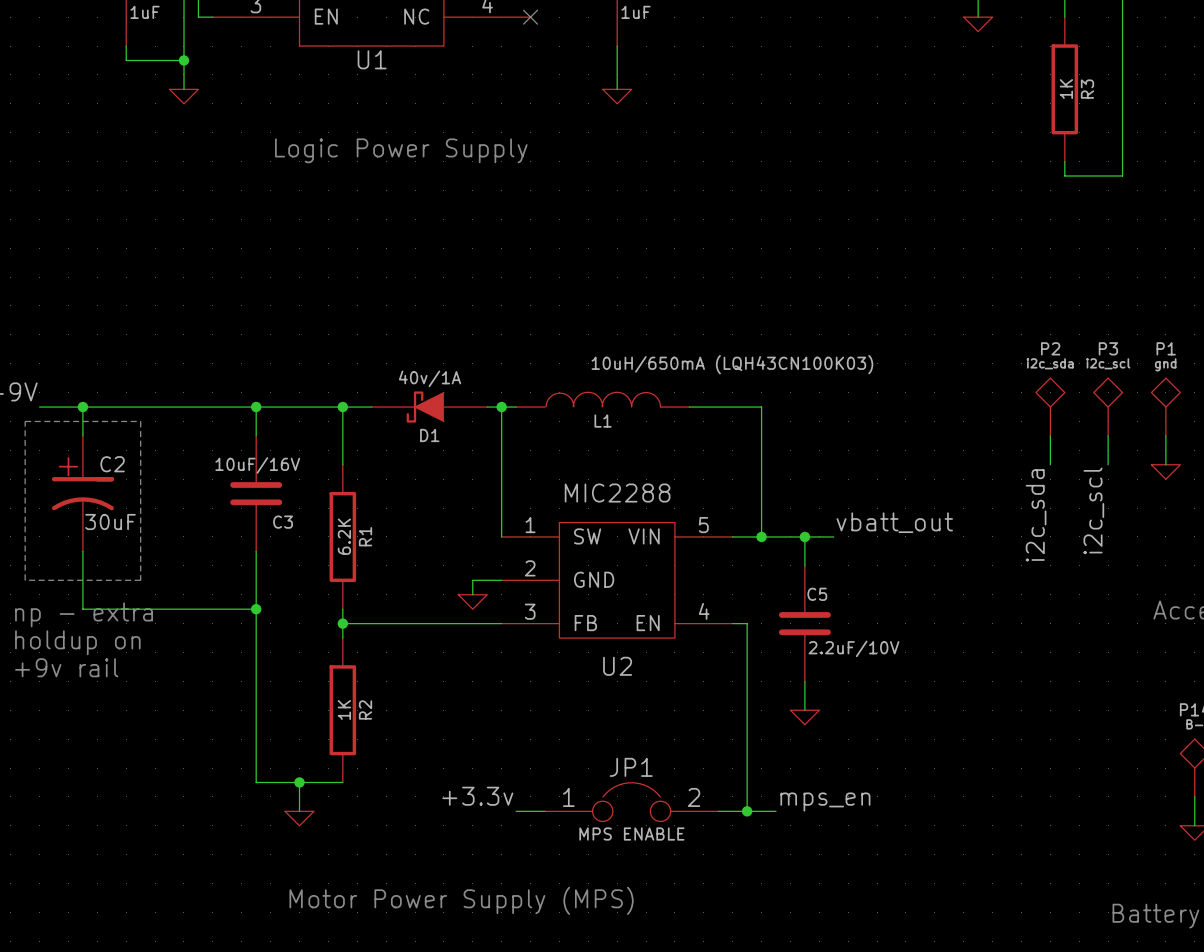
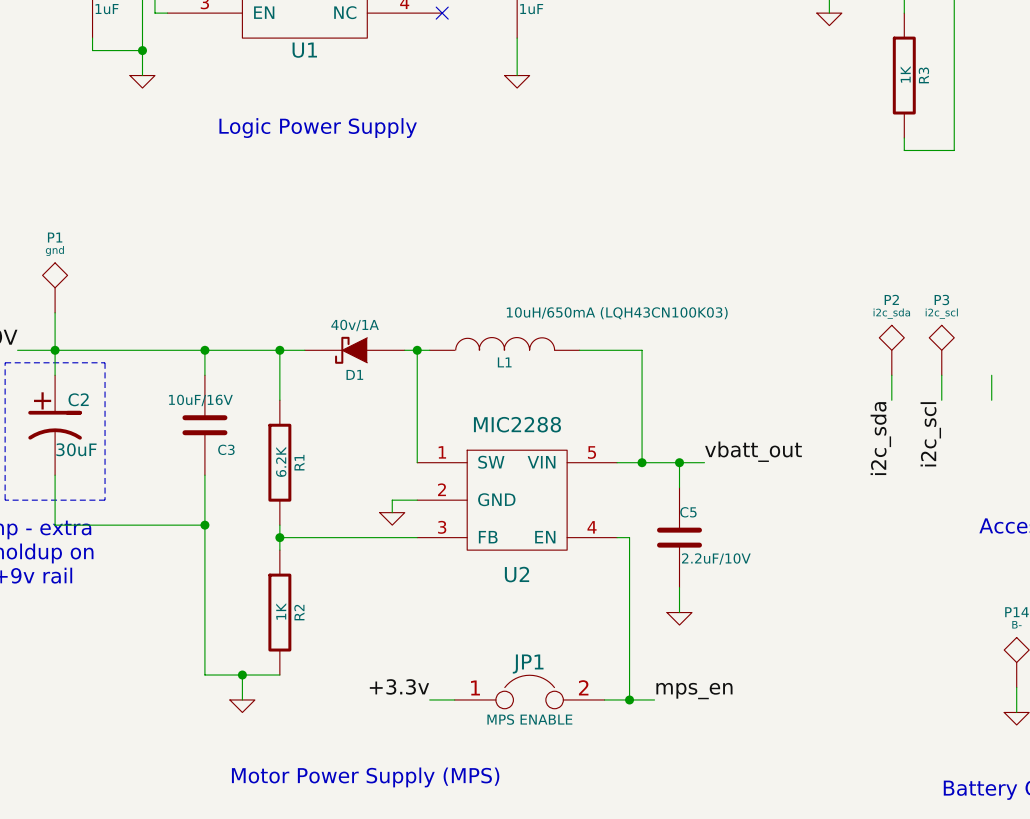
wire: none -> (55, 312) (55, 350)
P1 position: (1165, 407) -> (55, 287)
power symbol: (1165, 472) -> none

